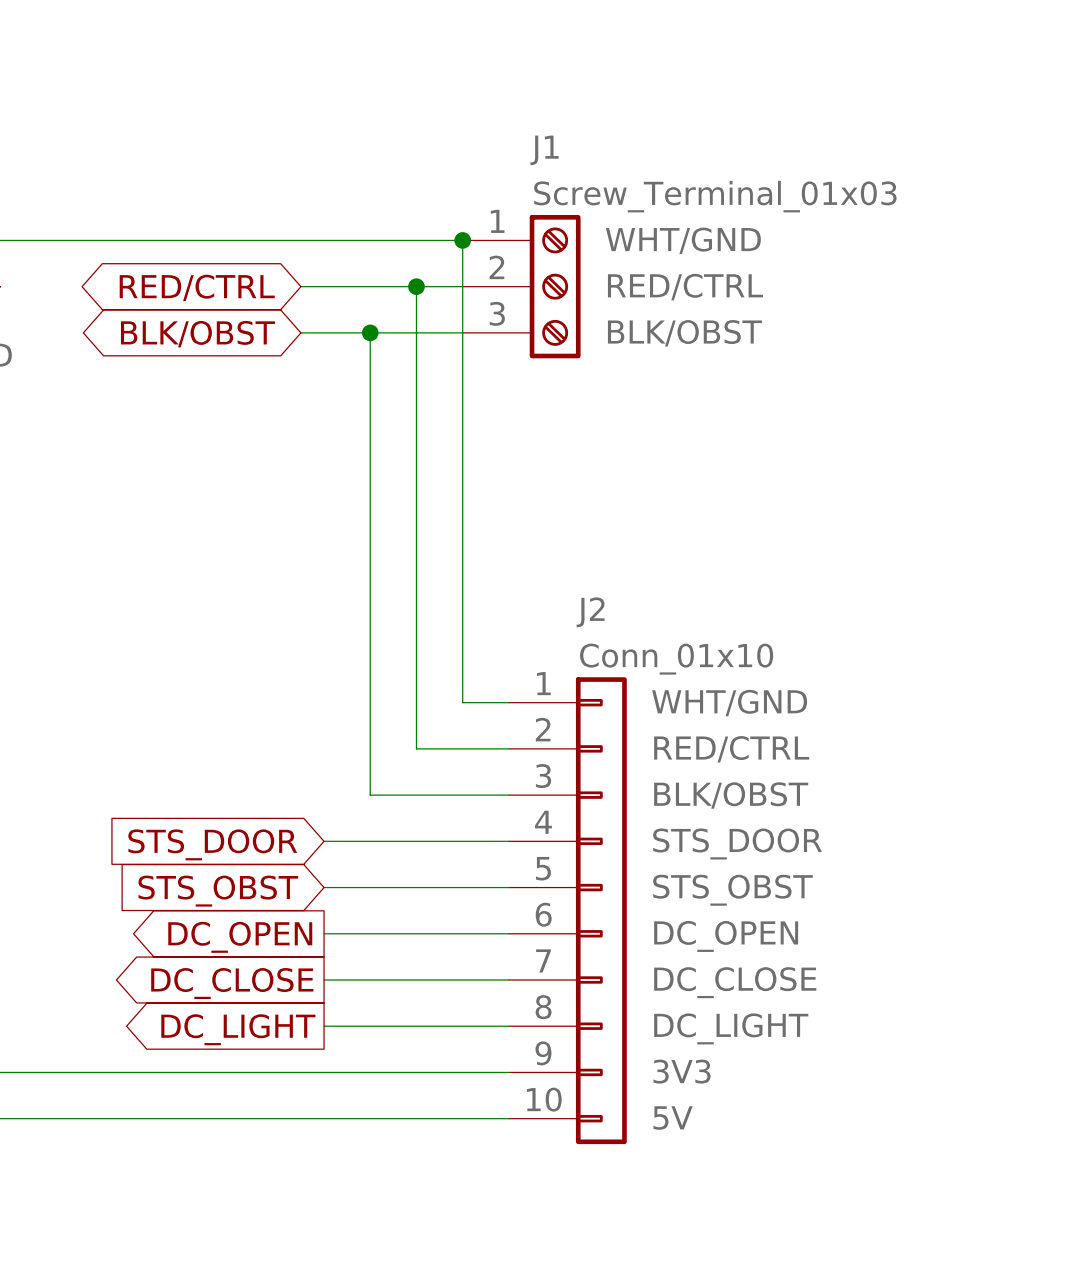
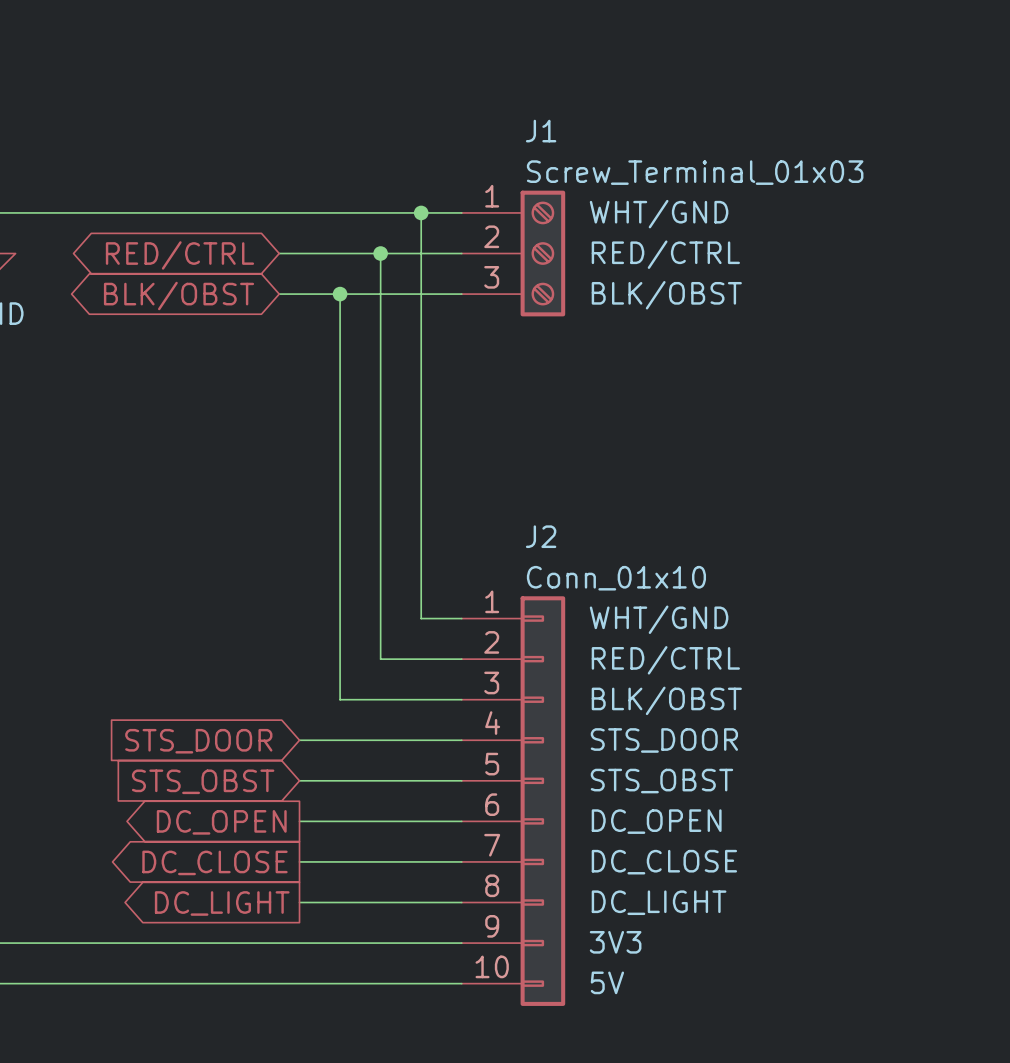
J1 position: (521, 286) -> (513, 253)

